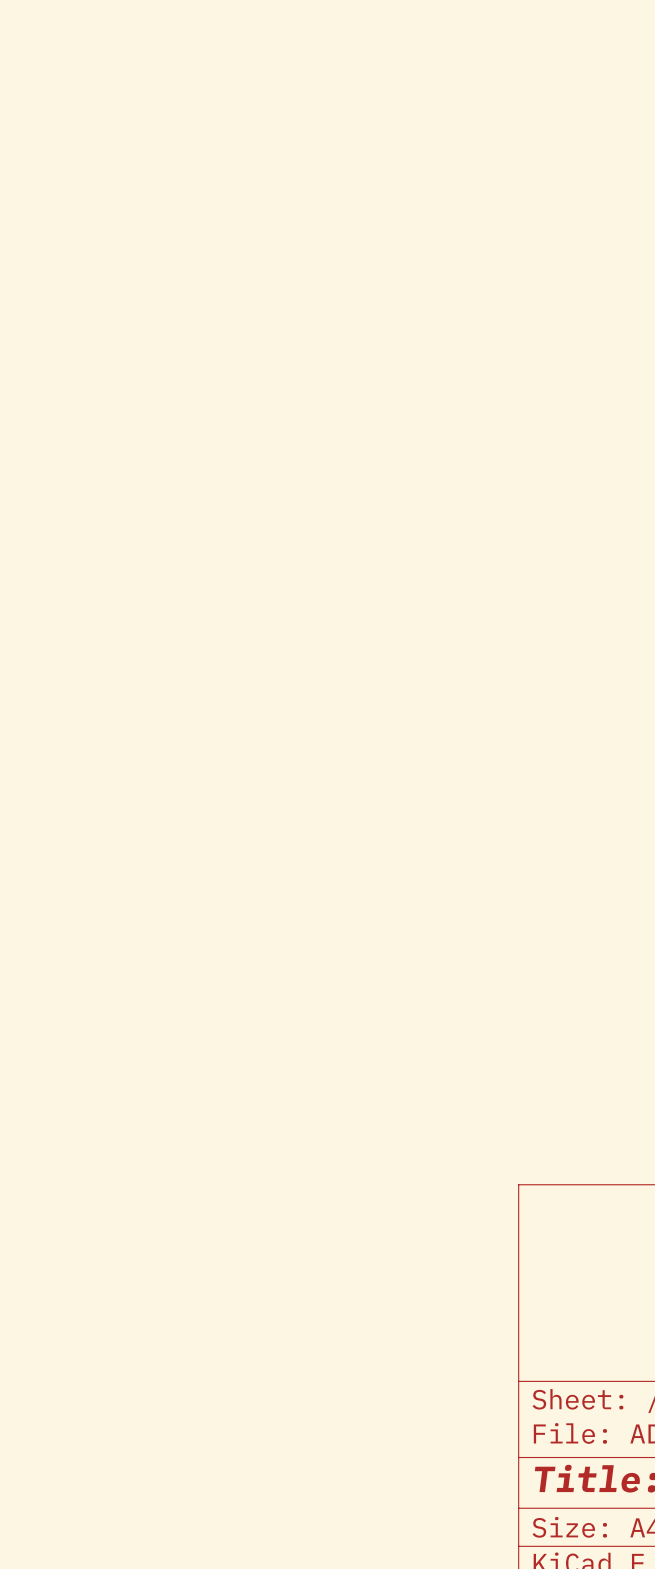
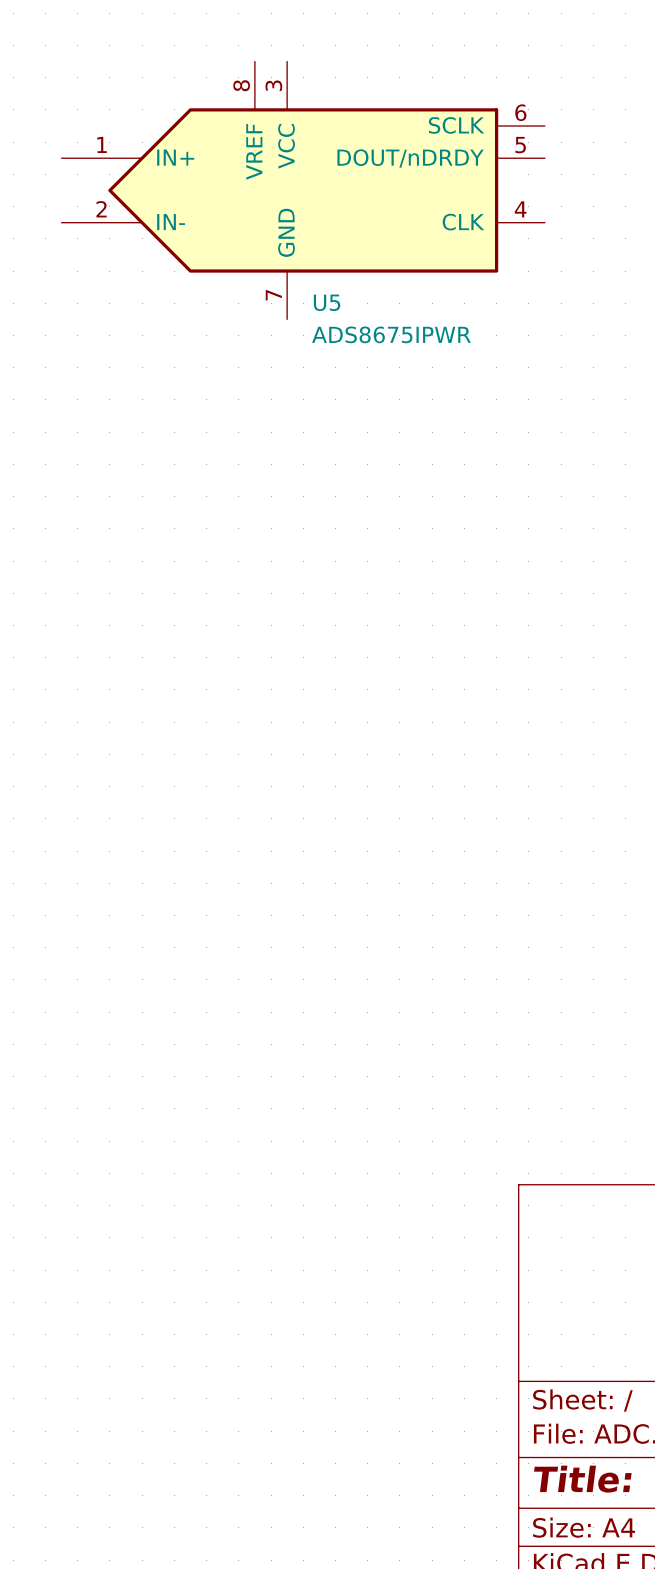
U5: none -> ADS8675IPWR (303, 190)

